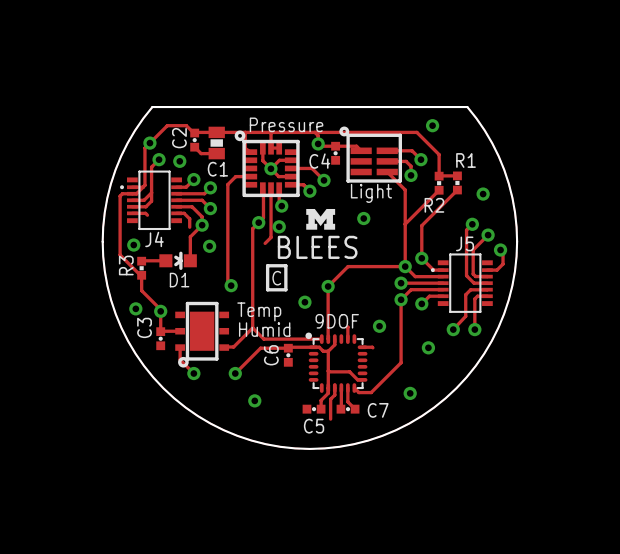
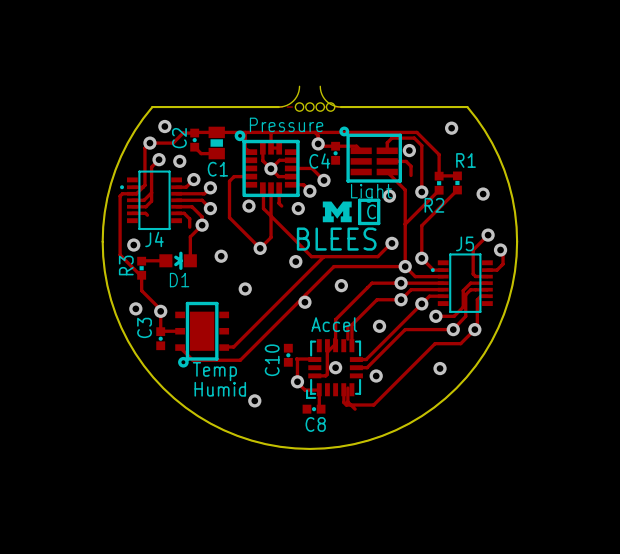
board edge: none -> (320, 86) (321, 94) (326, 100) (333, 105) (340, 107)
board edge: (278, 107) (340, 107) -> (278, 107) (286, 105) (293, 100) (297, 94) (299, 86)
hole: none -> (299, 107)
hole: none -> (309, 107)
hole: none -> (320, 107)
hole: none -> (330, 107)
via: (432, 125) -> none
via: none -> (164, 126)
via: none -> (451, 128)
track: (192, 131) (186, 125) (167, 125) (149, 143) -> (194, 133) (183, 133) (173, 143) (149, 143)
track: (387, 150) (412, 150) (420, 159) -> (387, 150) (387, 142) (391, 138) (414, 138) (421, 145) (421, 191)
via position: (420, 159) -> (409, 150)
via: (411, 175) -> none
track: (235, 176) (227, 184) (227, 282) (231, 285) -> (235, 176) (229, 181) (229, 217) (260, 248)
via: none -> (421, 191)
via: none -> (389, 196)
line: none -> (359, 200) (359, 223) (378, 223) (378, 200) (359, 200)
via: none -> (248, 206)
via: (281, 206) -> none
track: (263, 208) (263, 217) (252, 228) (252, 327) (263, 339) (321, 339) -> (263, 208) (311, 256) (377, 256) (391, 243)
via: none -> (298, 208)
via: (363, 218) -> none
drawing position: (320, 219) -> (337, 211)
via: (258, 222) -> none
track: (472, 224) (466, 230) (466, 275) (474, 283) -> (435, 316) (454, 316) (463, 307) (463, 290) (470, 283) (474, 283)
via: (472, 224) -> none
via: (279, 226) -> none
via: none -> (391, 243)
via position: (209, 246) -> (221, 256)
text position: BLEES (317, 247) -> BLEES (336, 239)
via: none -> (260, 248)
track: none -> (323, 256) (252, 327)
via: none -> (295, 261)
line: (267, 265) (267, 289) (285, 289) (285, 265) (267, 265) -> none
track: (348, 266) (328, 286) (328, 338) -> (348, 266) (333, 266) (240, 360) (192, 360) (180, 347)
text position: C (276, 278) -> C (371, 211)
track: none -> (401, 283) (372, 283) (335, 319) (335, 345)
via position: (231, 285) -> (245, 288)
via position: (328, 286) -> (341, 285)
track: (480, 296) (474, 298) (474, 329) -> (480, 296) (477, 299) (477, 327) (460, 343) (435, 343) (373, 405) (346, 405) (343, 402) (343, 389)
track: (401, 299) (401, 362) (371, 392) (358, 392) (354, 388) -> (401, 299) (377, 299) (351, 324) (351, 345)
track: none -> (421, 303) (366, 359) (356, 359)
text position: Temp (259, 311) -> Temp (214, 371)
via: none -> (435, 316)
text: 9DOF (337, 321) -> Accel (334, 324)
text position: Humid (264, 329) -> Humid (220, 389)
track: none -> (453, 329) (405, 329) (367, 367) (356, 367)
part footprint: [305, 332, 368, 393] -> [306, 339, 363, 399]
track: none -> (327, 345) (327, 374) (314, 375)
track: (180, 347) (180, 359) (193, 373) -> none
track: (362, 347) (372, 347) -> none
via: (428, 347) -> none
C6 name: C6 (271, 355) -> C10 (272, 360)
track: none -> (314, 359) (296, 359) (297, 382) (304, 390) (319, 389) (319, 408)
via: none -> (335, 367)
via: none -> (440, 368)
track: (328, 371) (349, 371) (357, 379) (362, 379) -> none
via: (193, 373) -> none
track: (235, 373) (260, 348) (319, 347) (323, 351) (328, 351) (328, 388) -> none
via: (235, 373) -> none
via: none -> (376, 376)
via: none -> (297, 381)
track: (334, 385) (334, 395) (330, 399) (330, 419) -> none
track: (328, 388) (328, 393) (321, 400) (321, 409) -> none
track: (341, 388) (340, 409) -> none
via: (410, 393) -> none
C7: (348, 409) -> none
C5 name: C5 (314, 426) -> C8 (315, 424)

